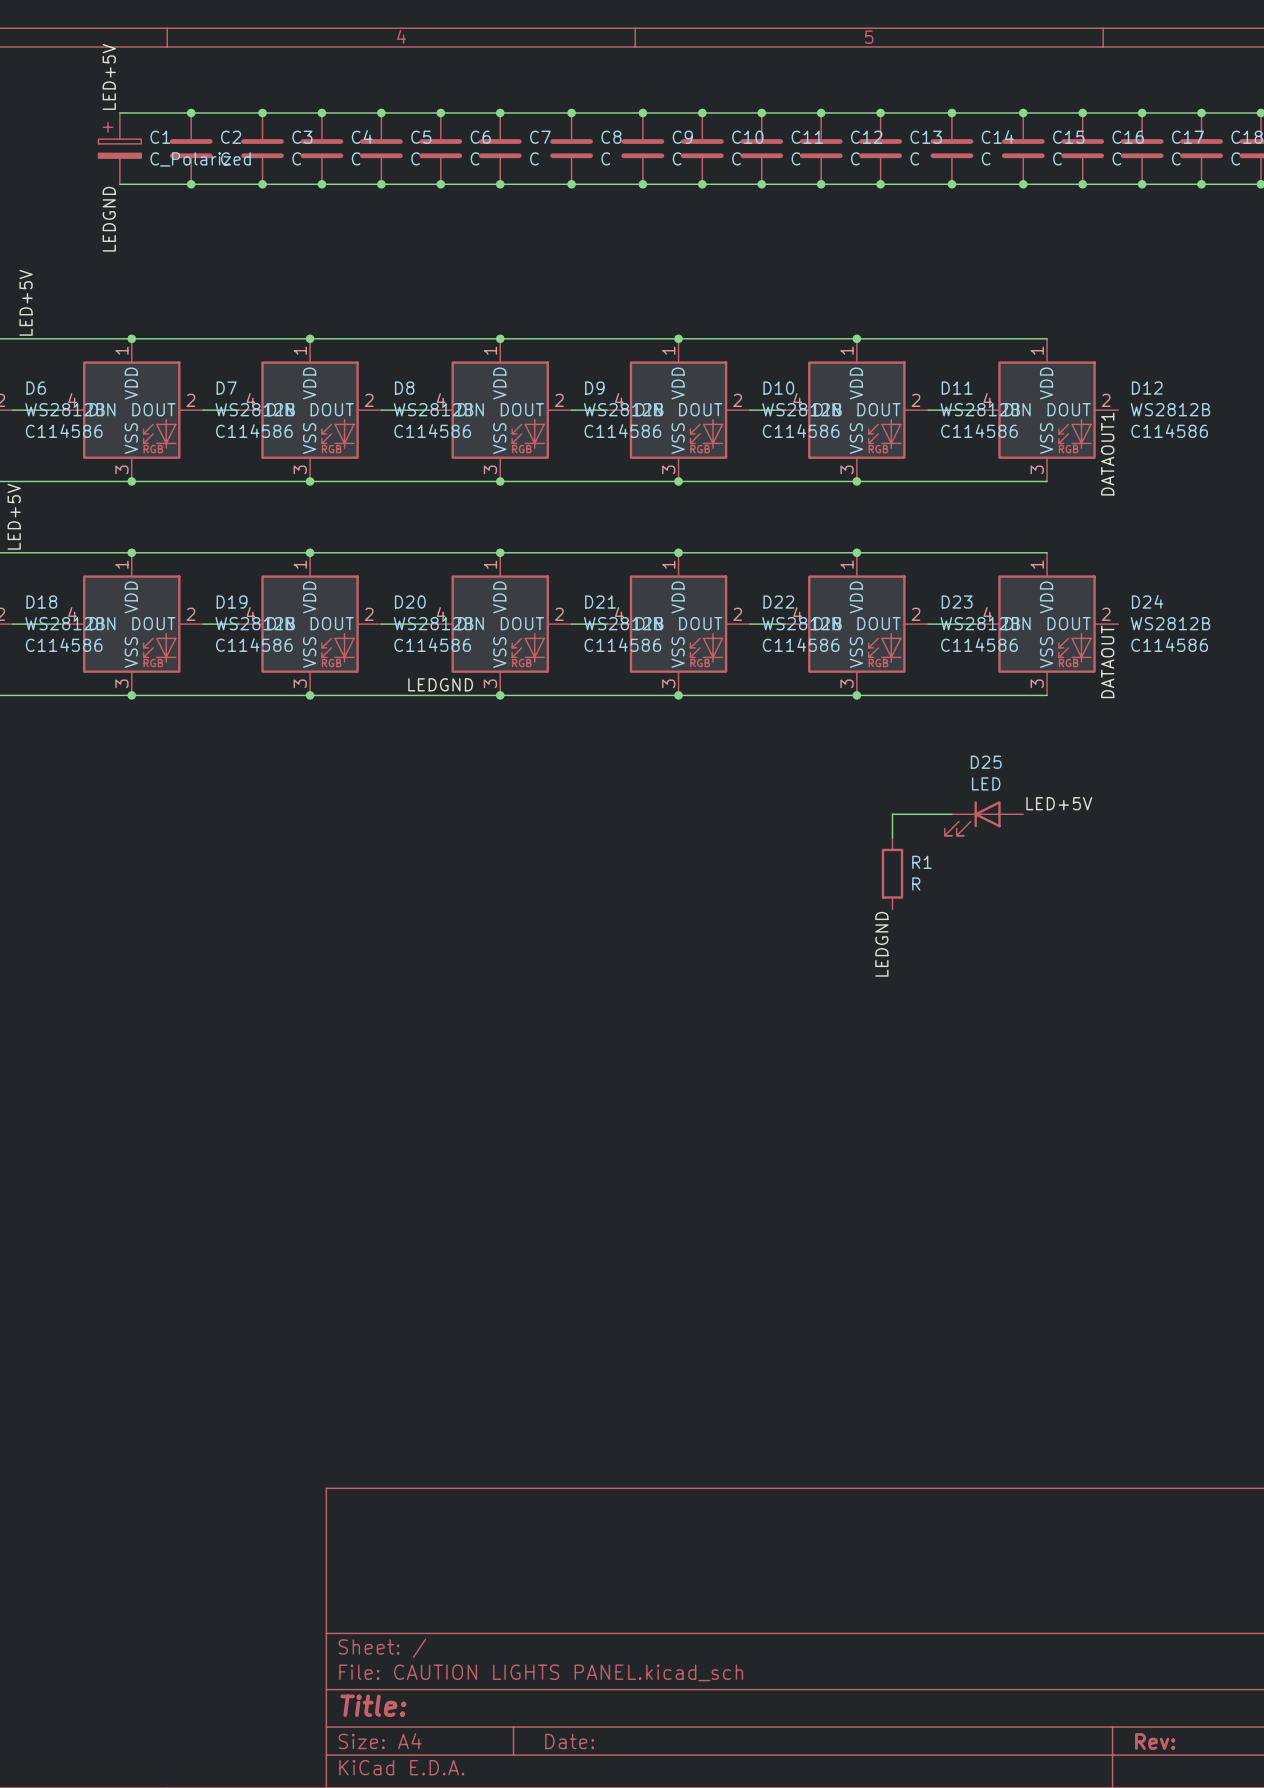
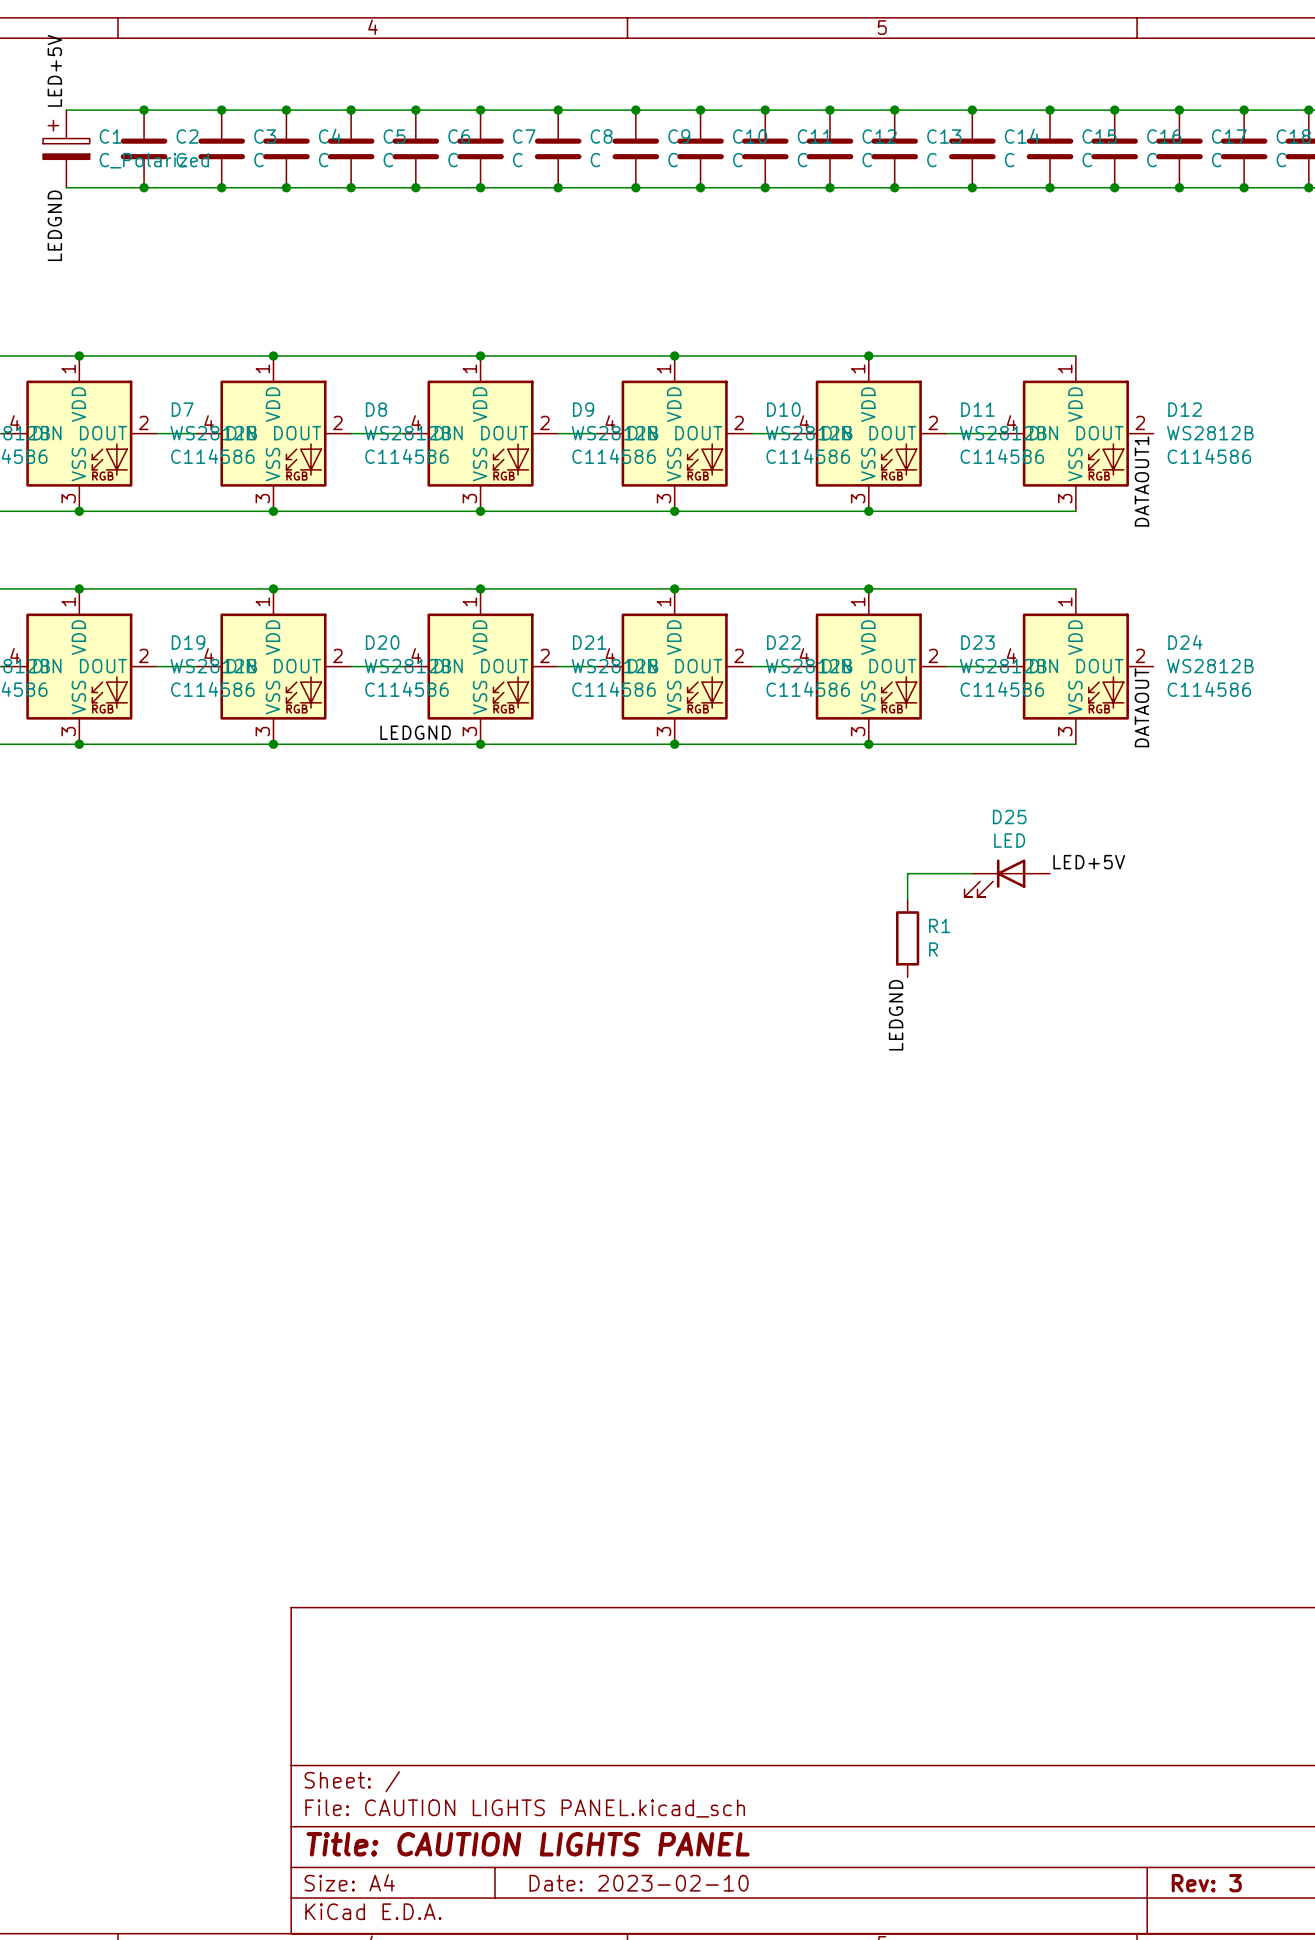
title block: Title: (373, 1705) -> Title: CAUTION LIGHTS PANEL (528, 1844)
title block: Date: (569, 1741) -> Date: 2023-02-10 (639, 1883)
title block: Rev: (1155, 1741) -> Rev: 3 (1206, 1883)

